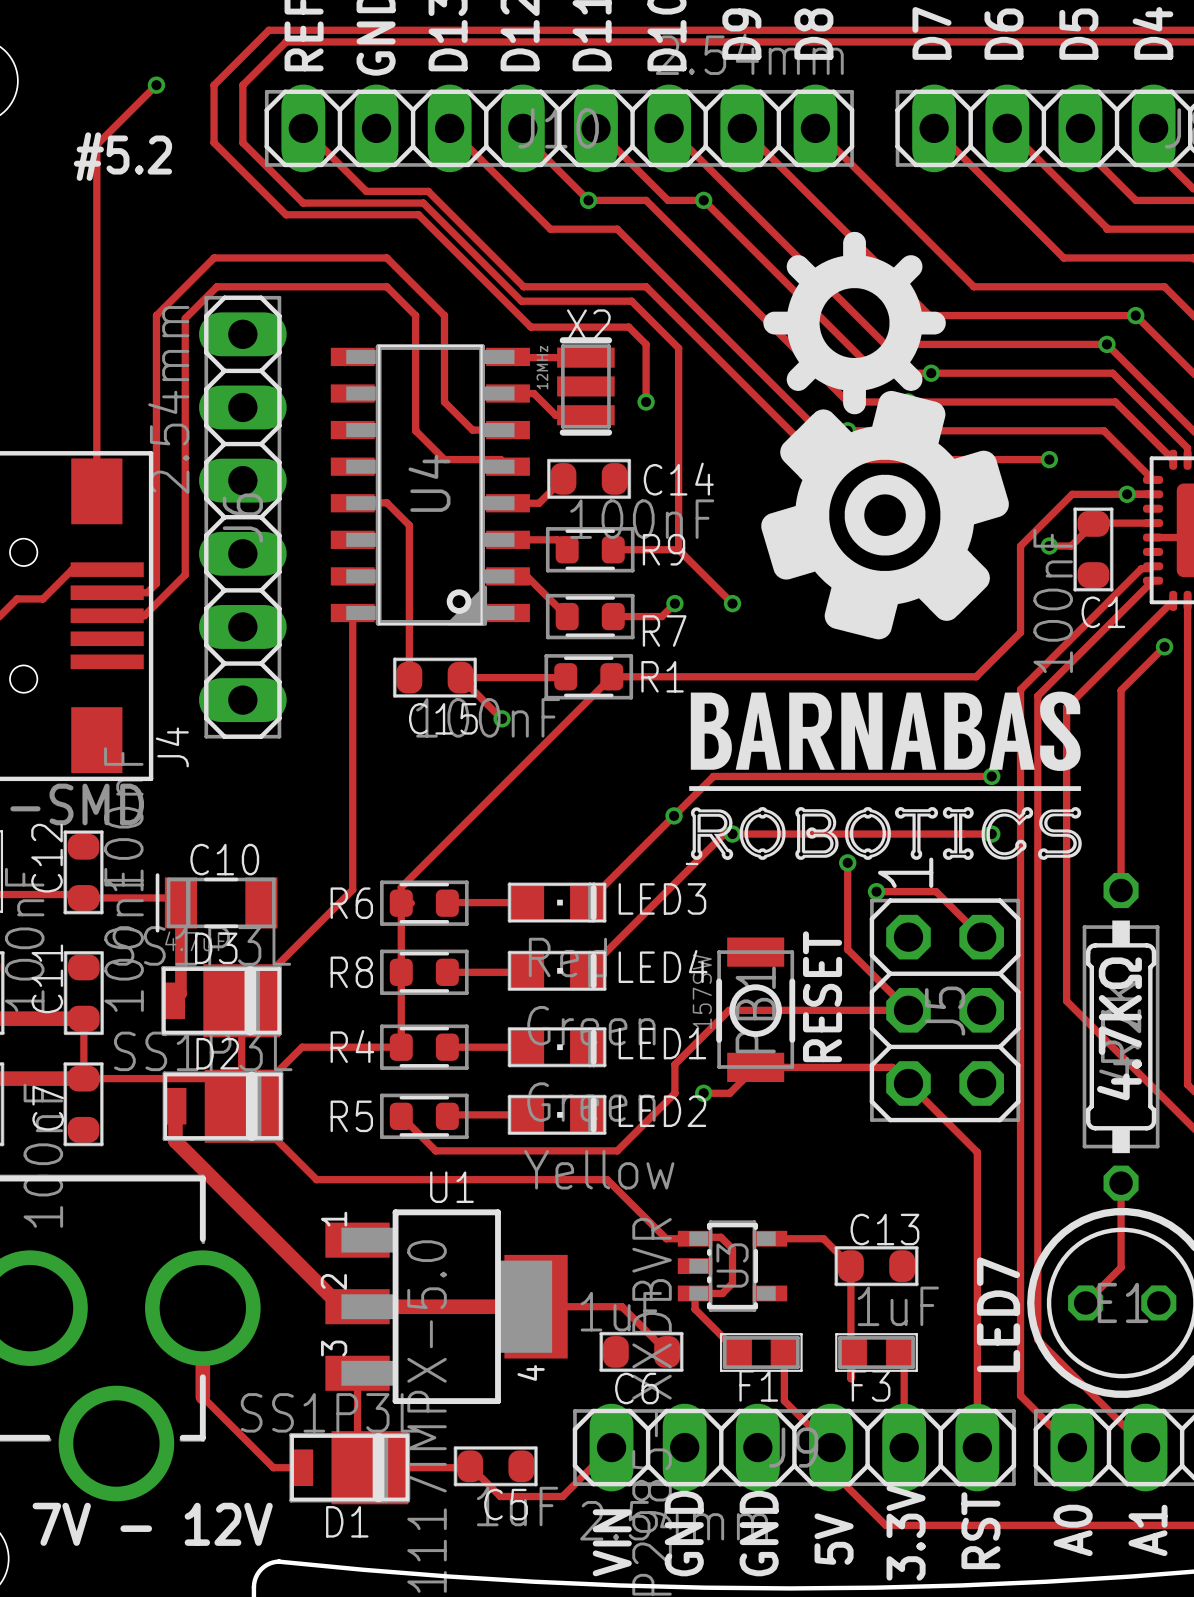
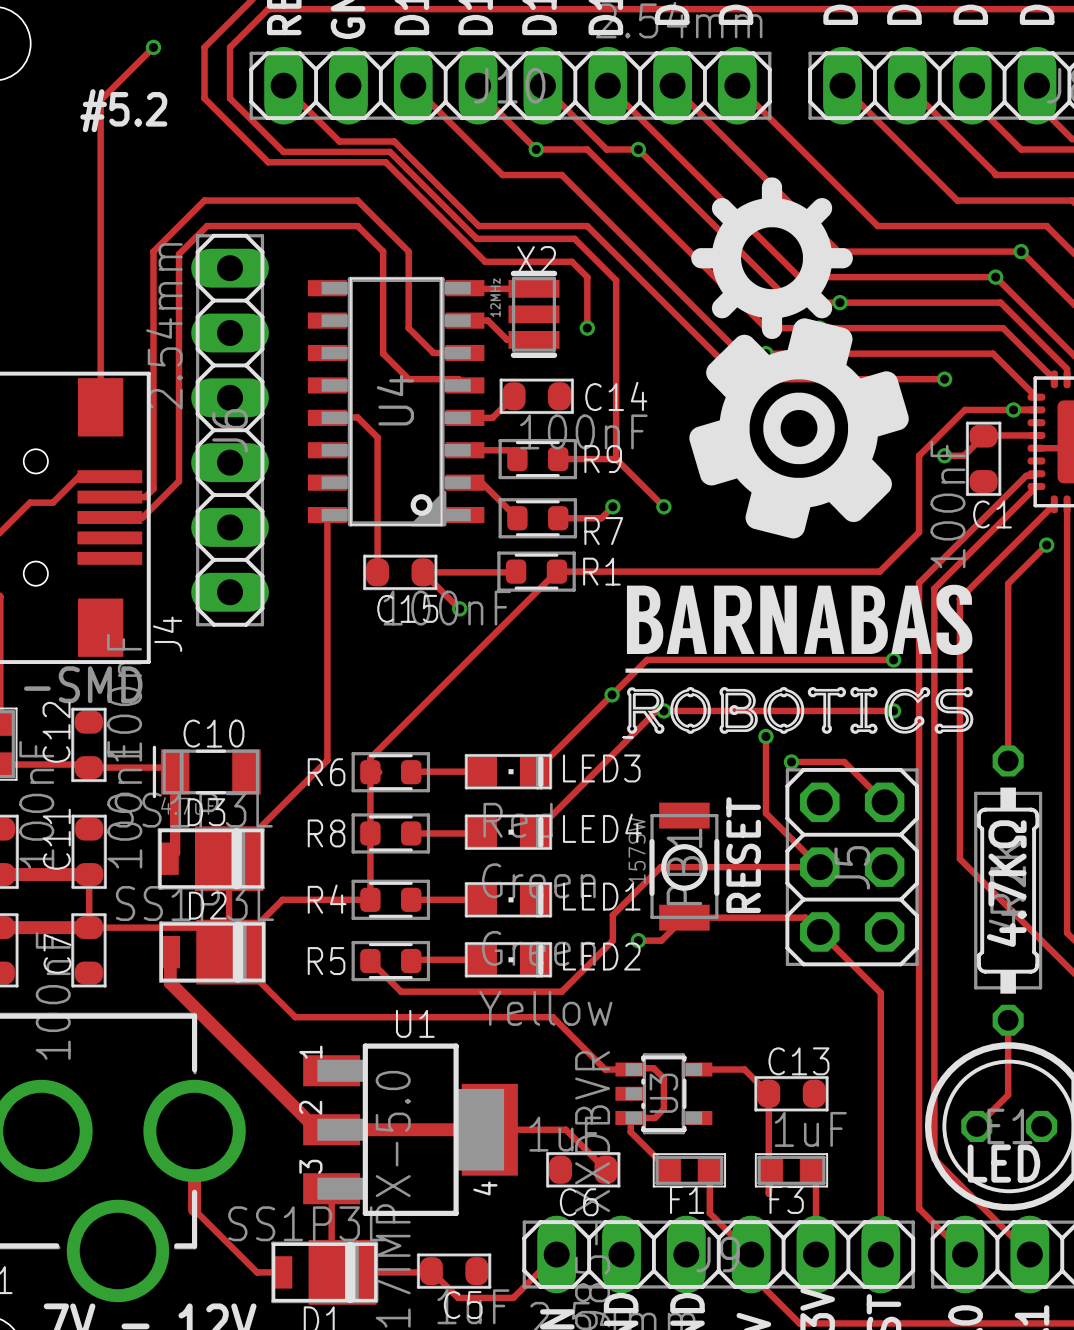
text: 1 (905, 872) -> none
text: LED7 (998, 1314) -> none
text: none -> LED (1003, 1163)

